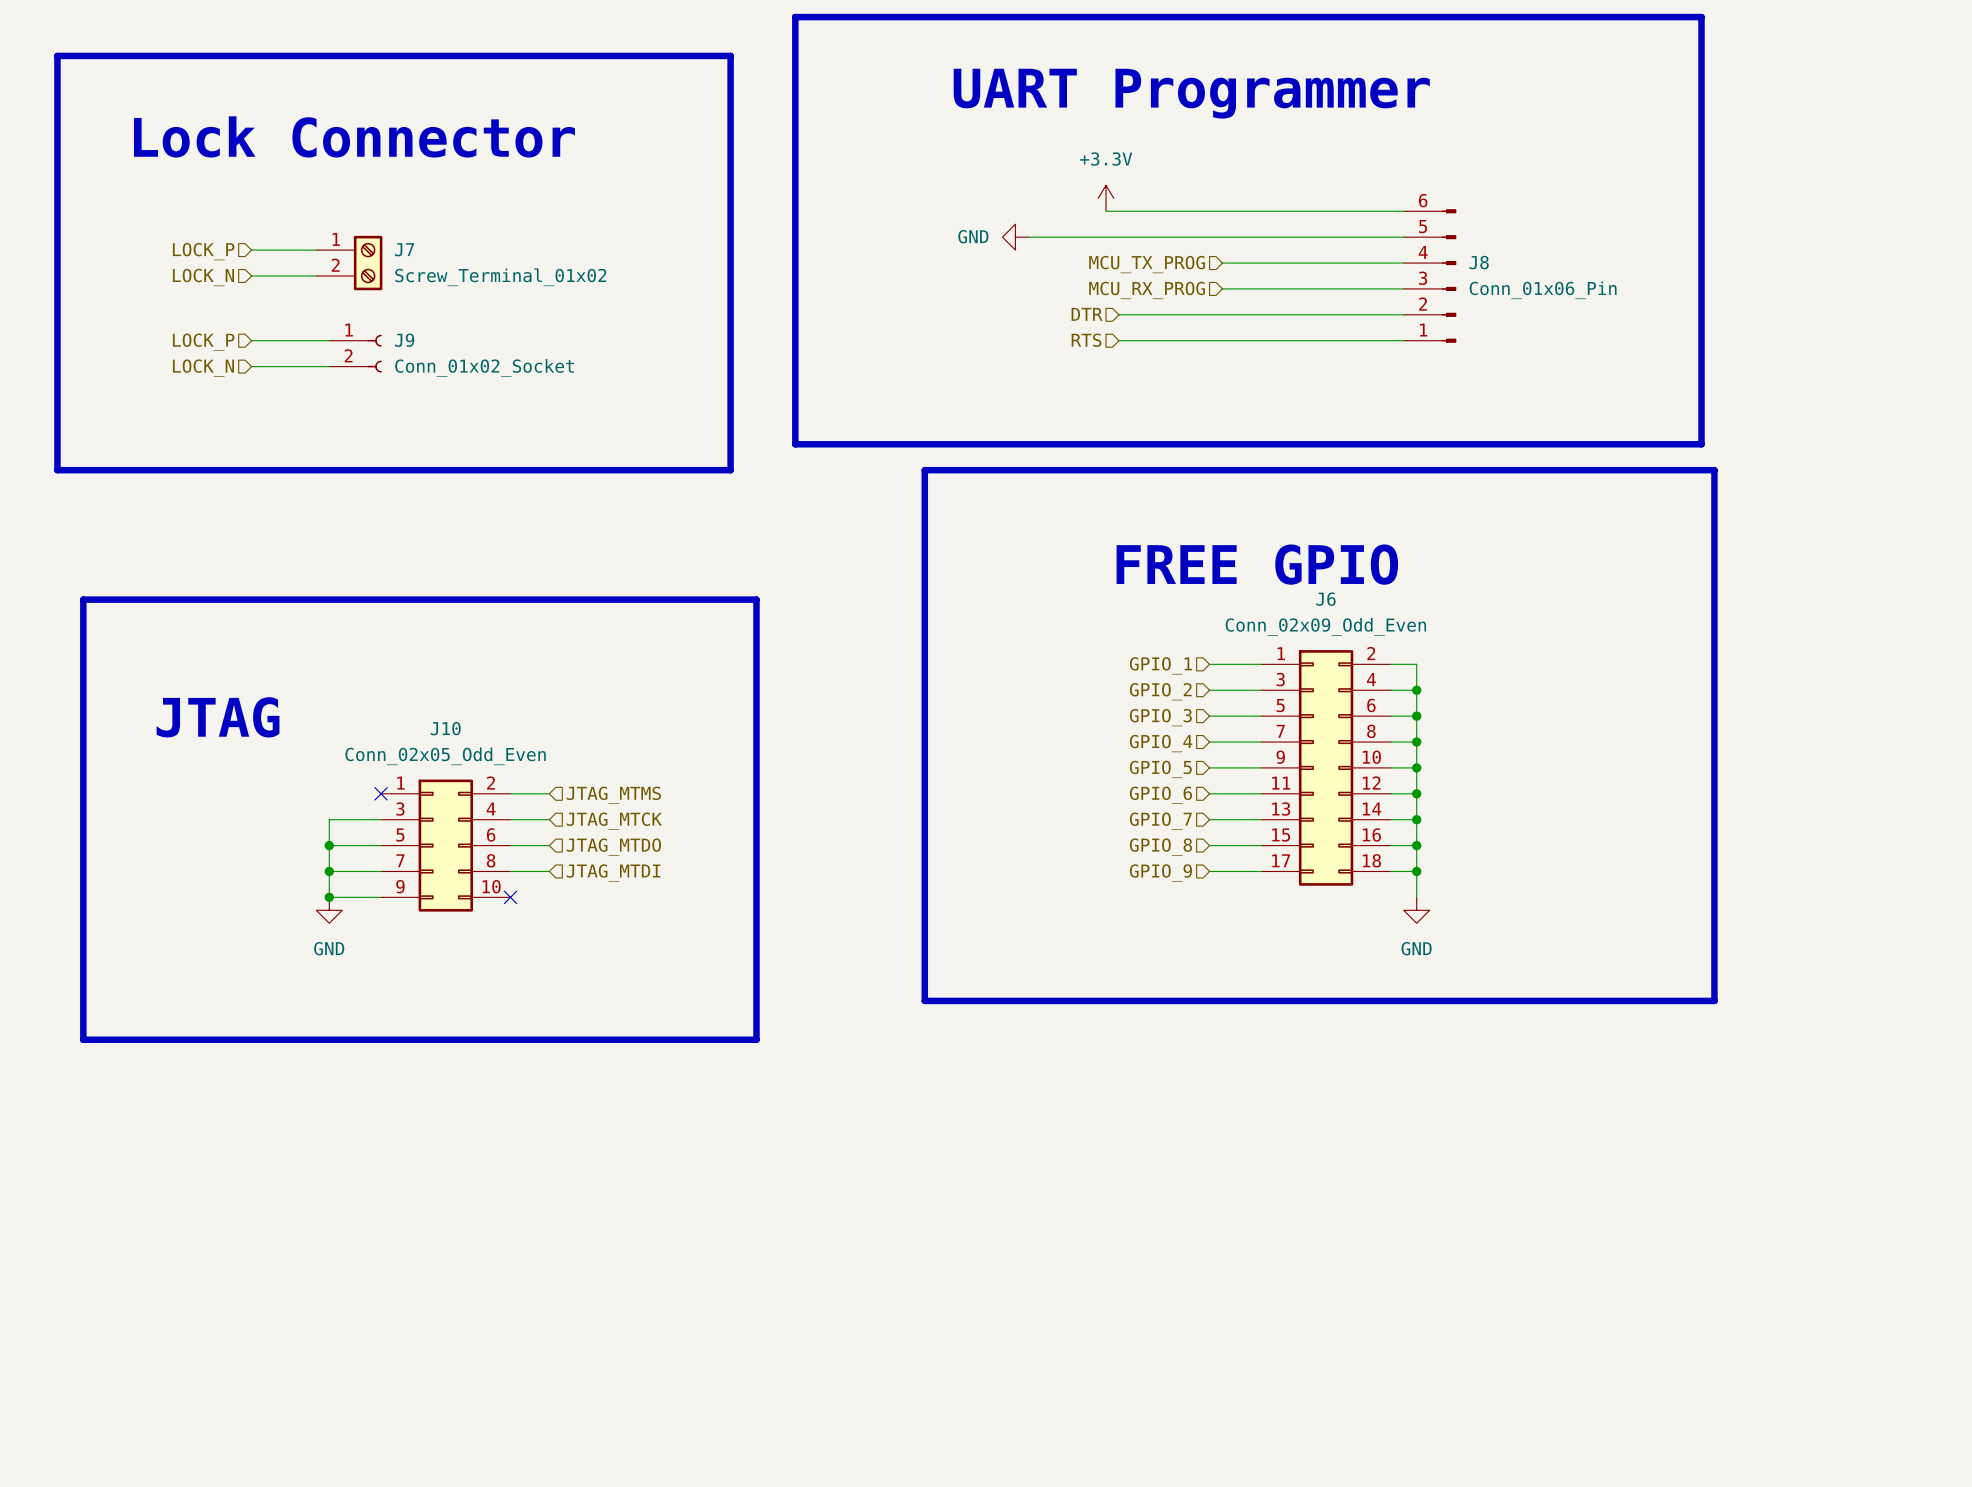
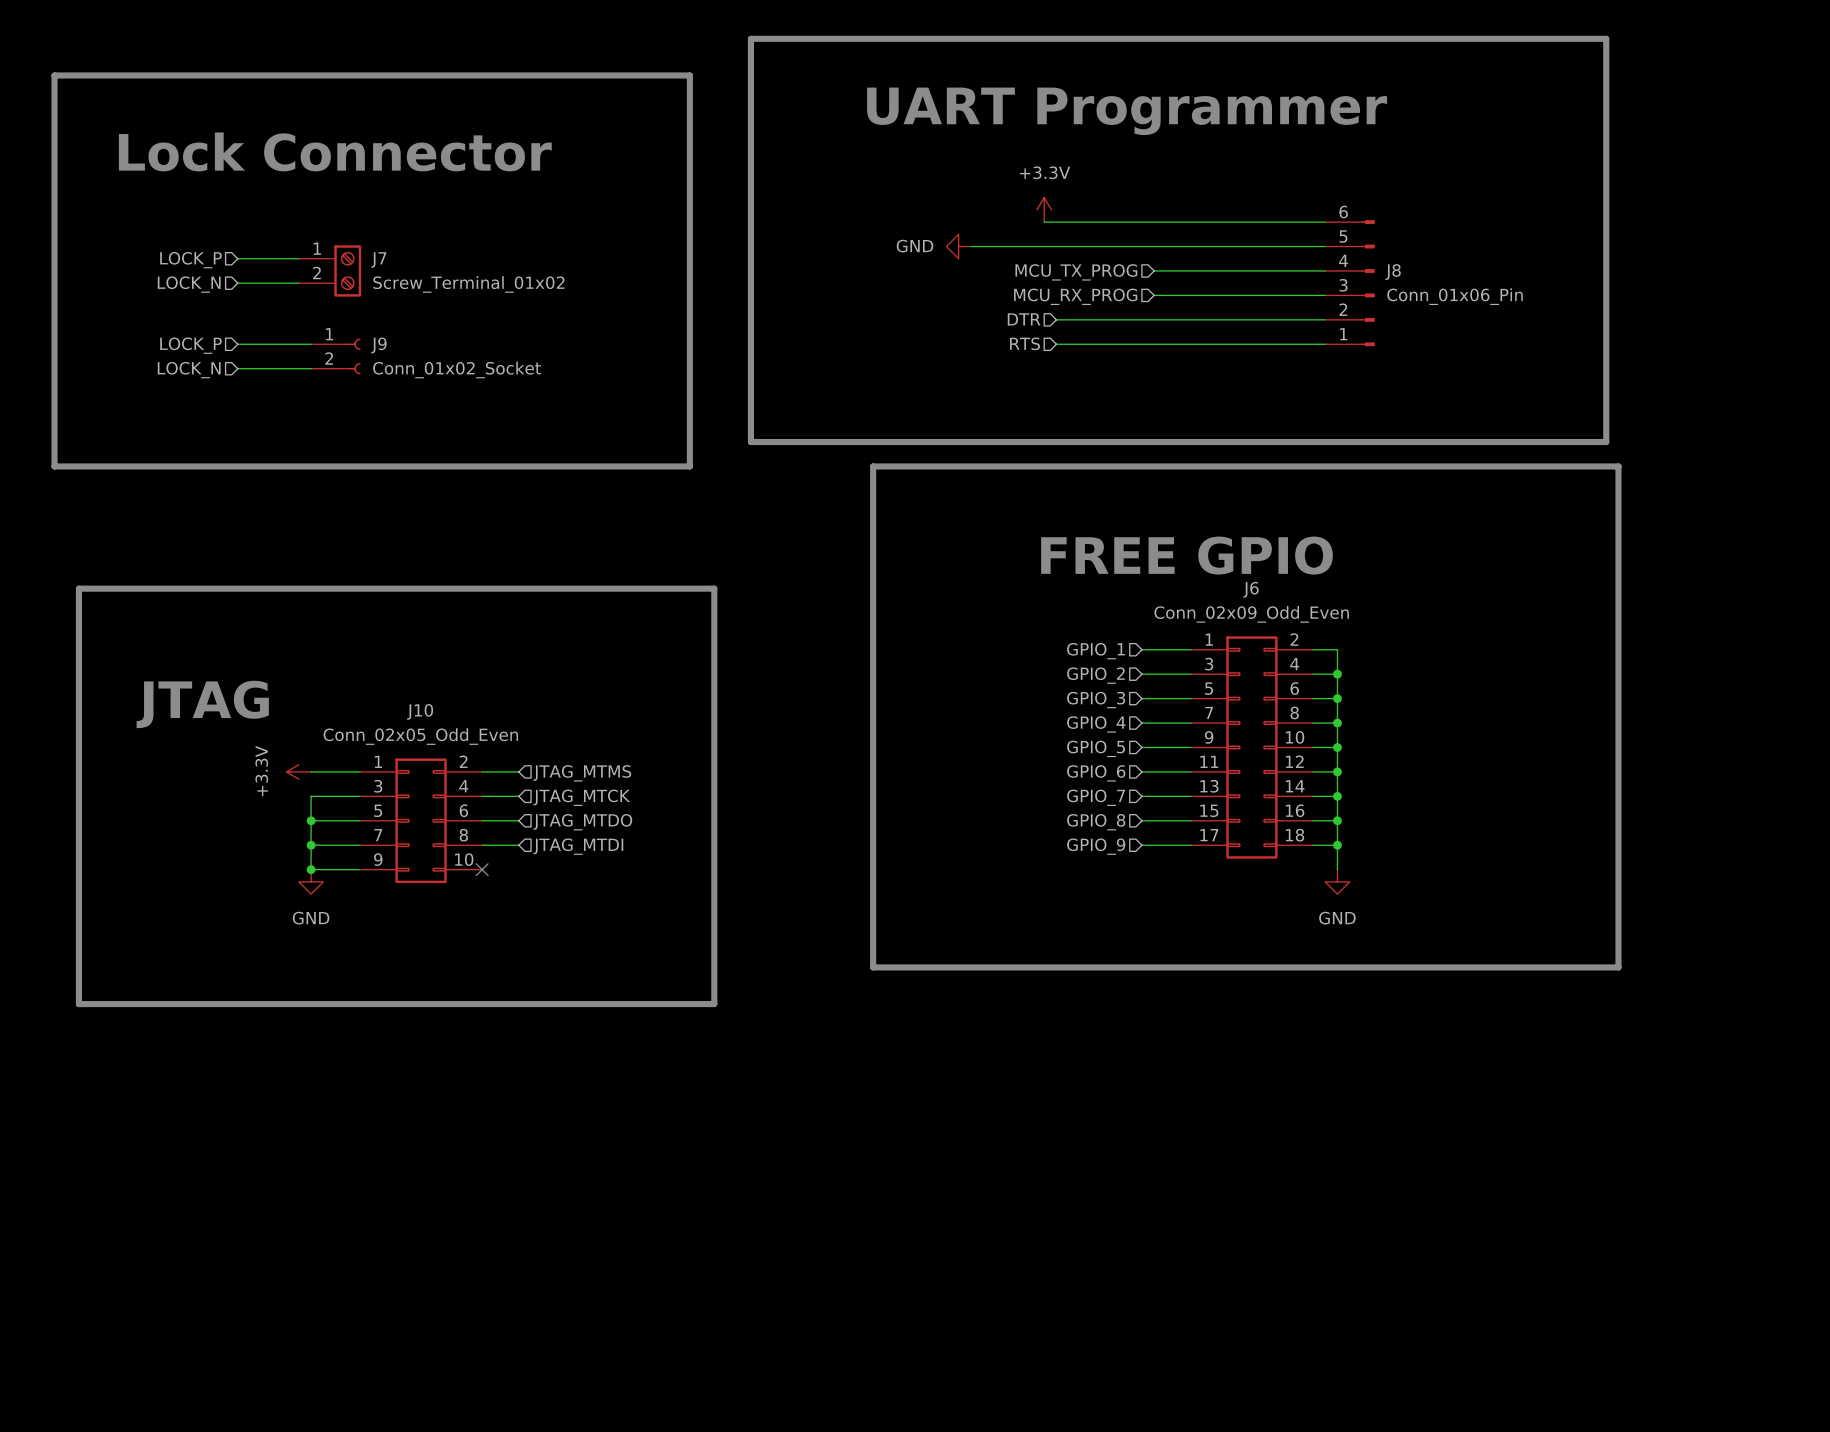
power symbol: none -> +3.3V (298, 771)
wire: none -> (311, 771) (359, 771)
no-connect mark: (381, 793) -> none

